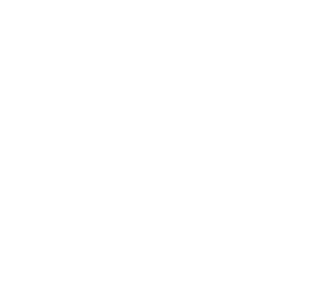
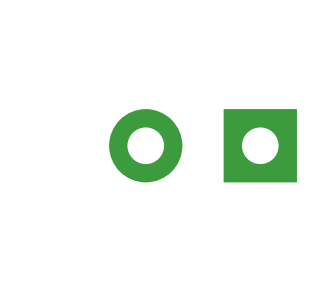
part: none -> (203, 145)

